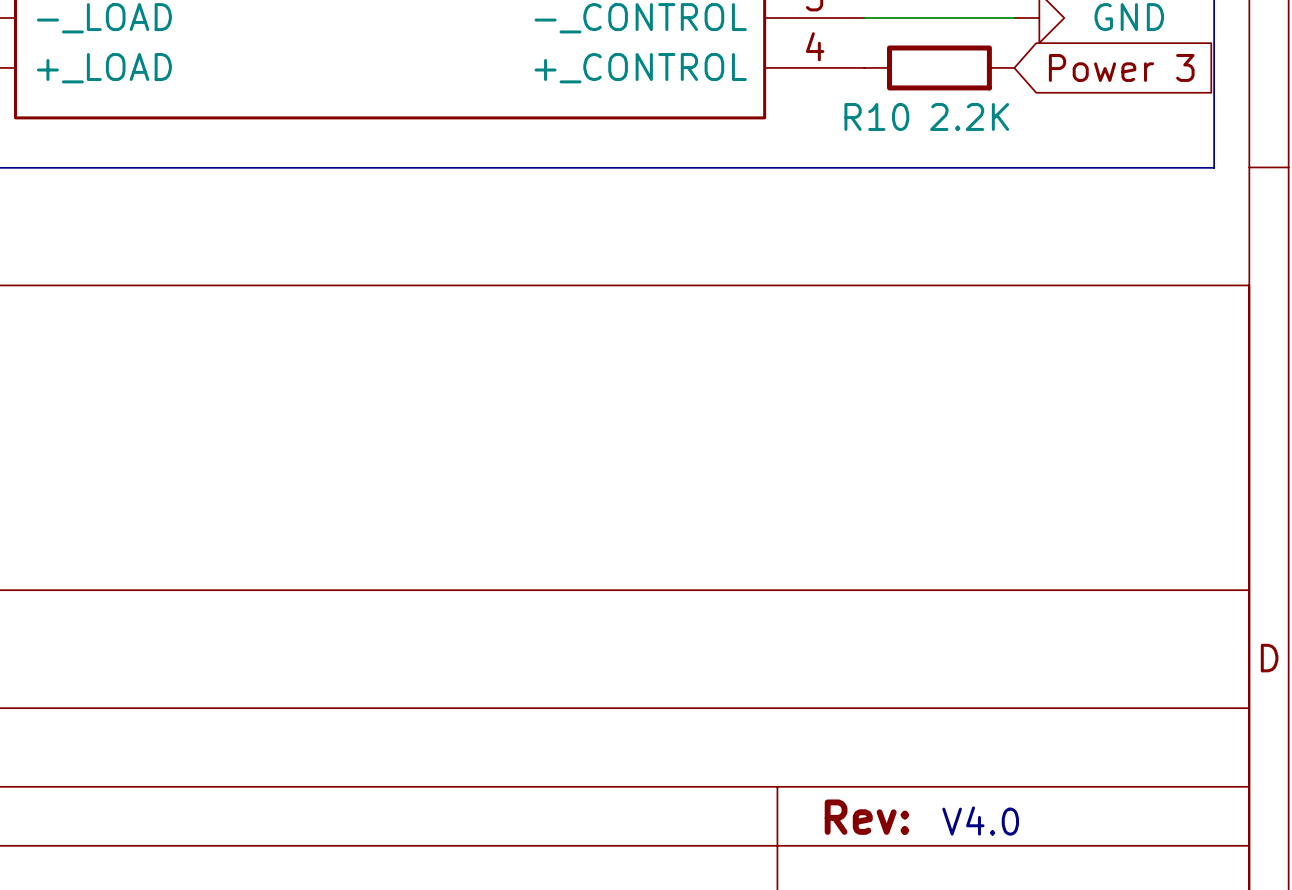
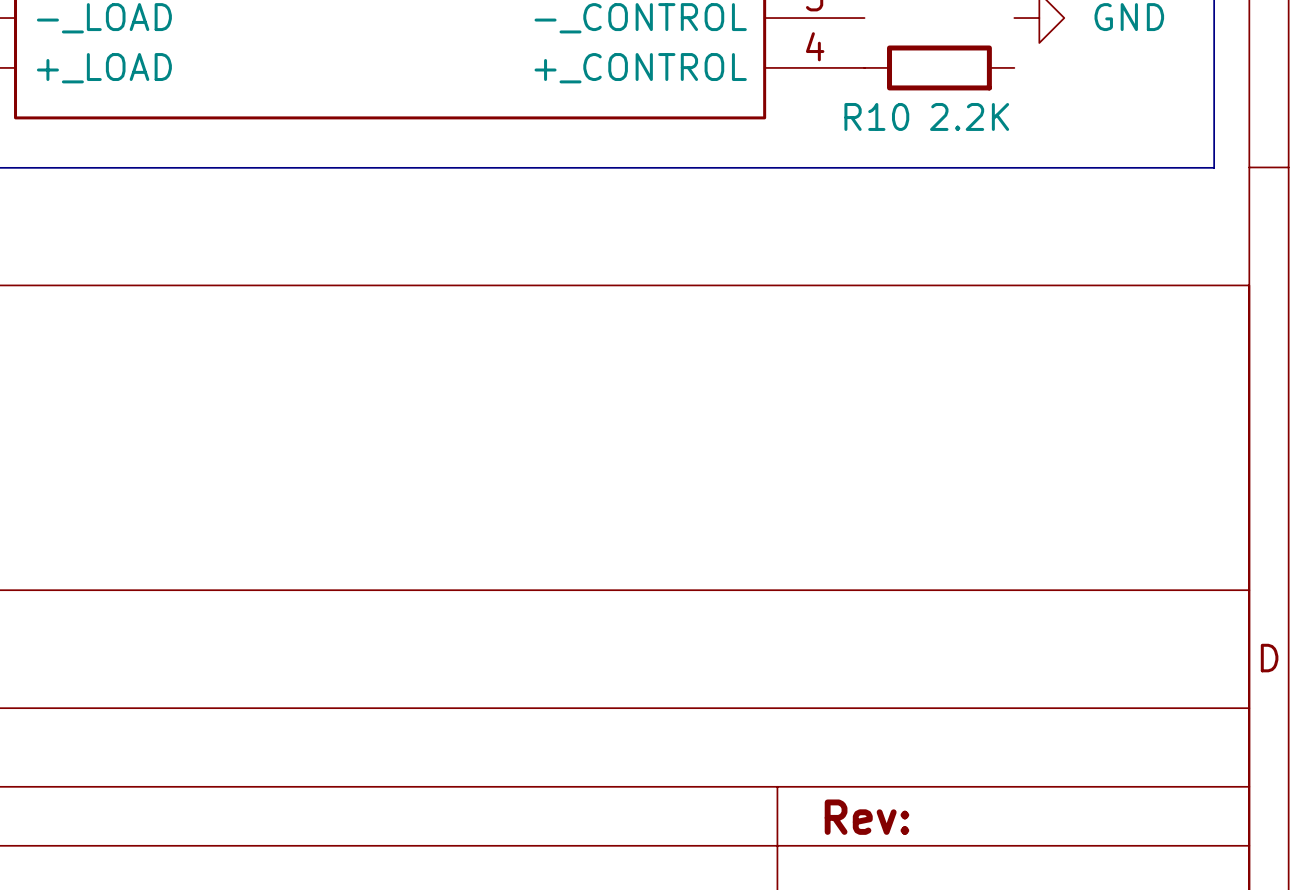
wire: (864, 18) (1014, 18) -> none
global label: Power 3 (1121, 67) -> none
text: V4.0 (980, 821) -> none

